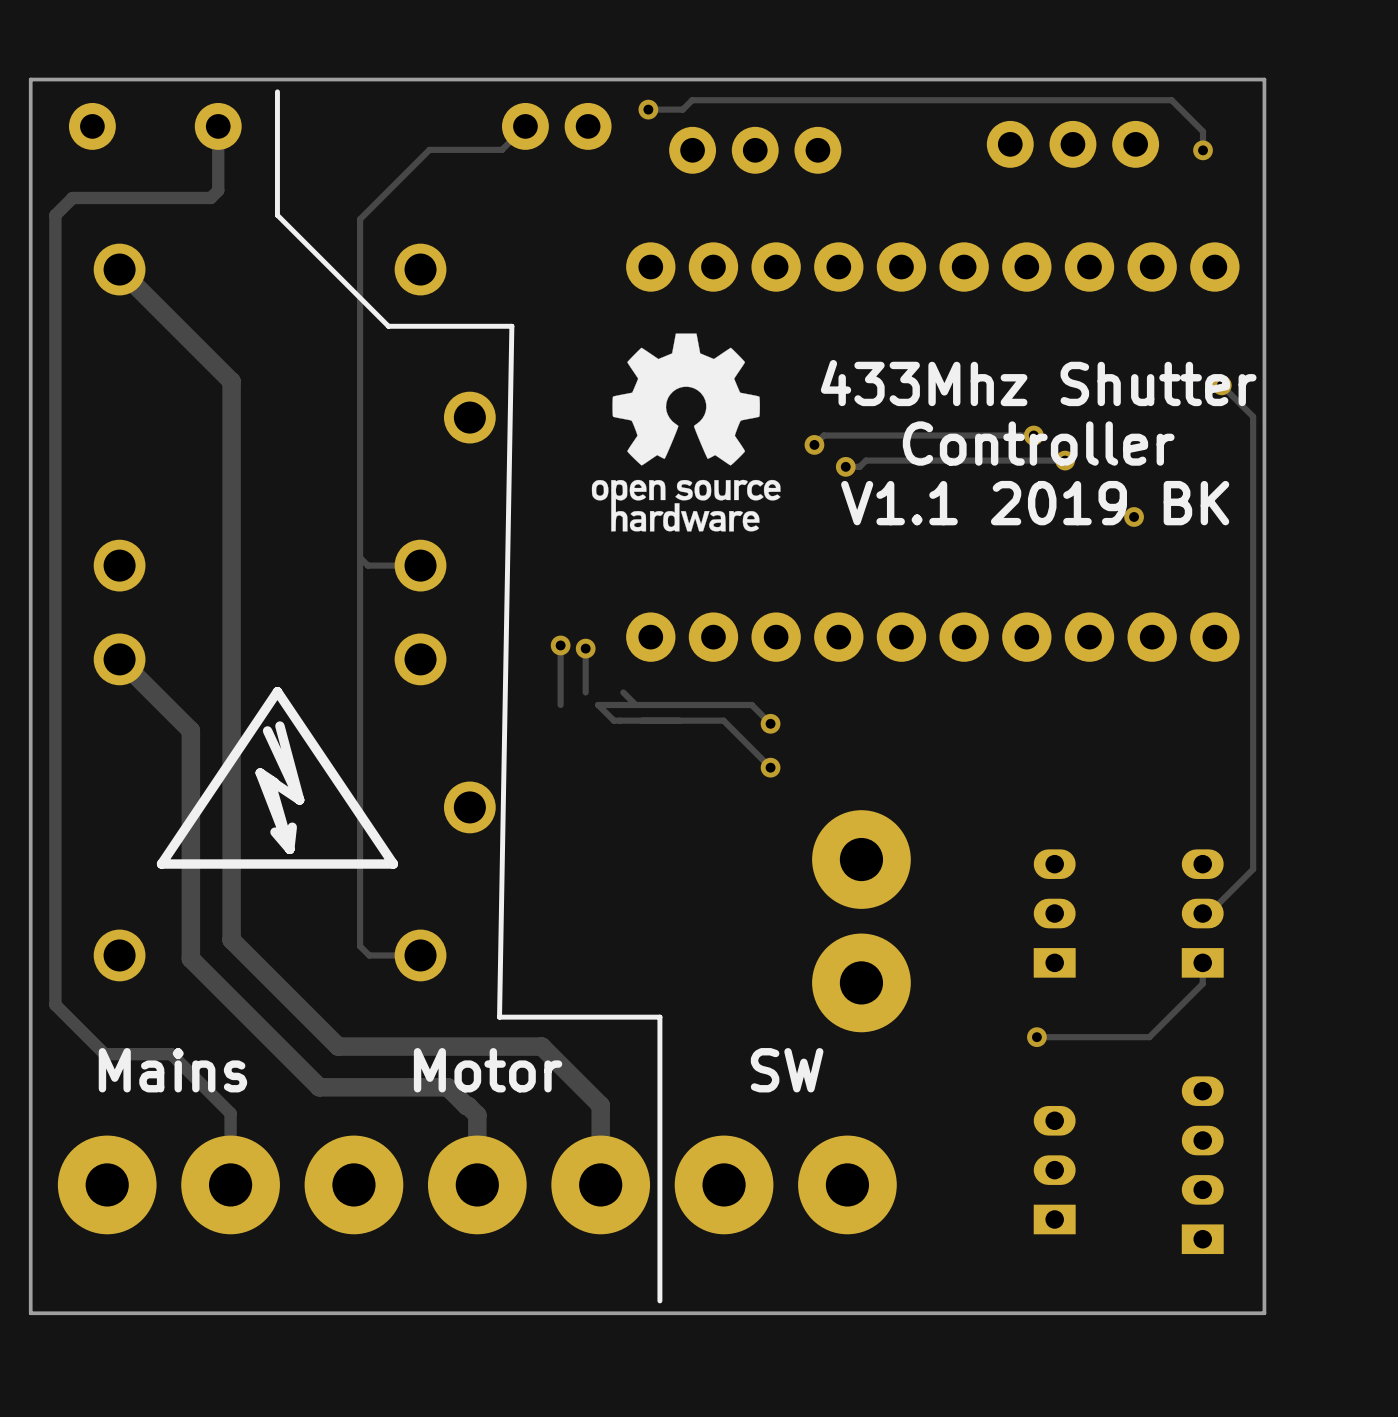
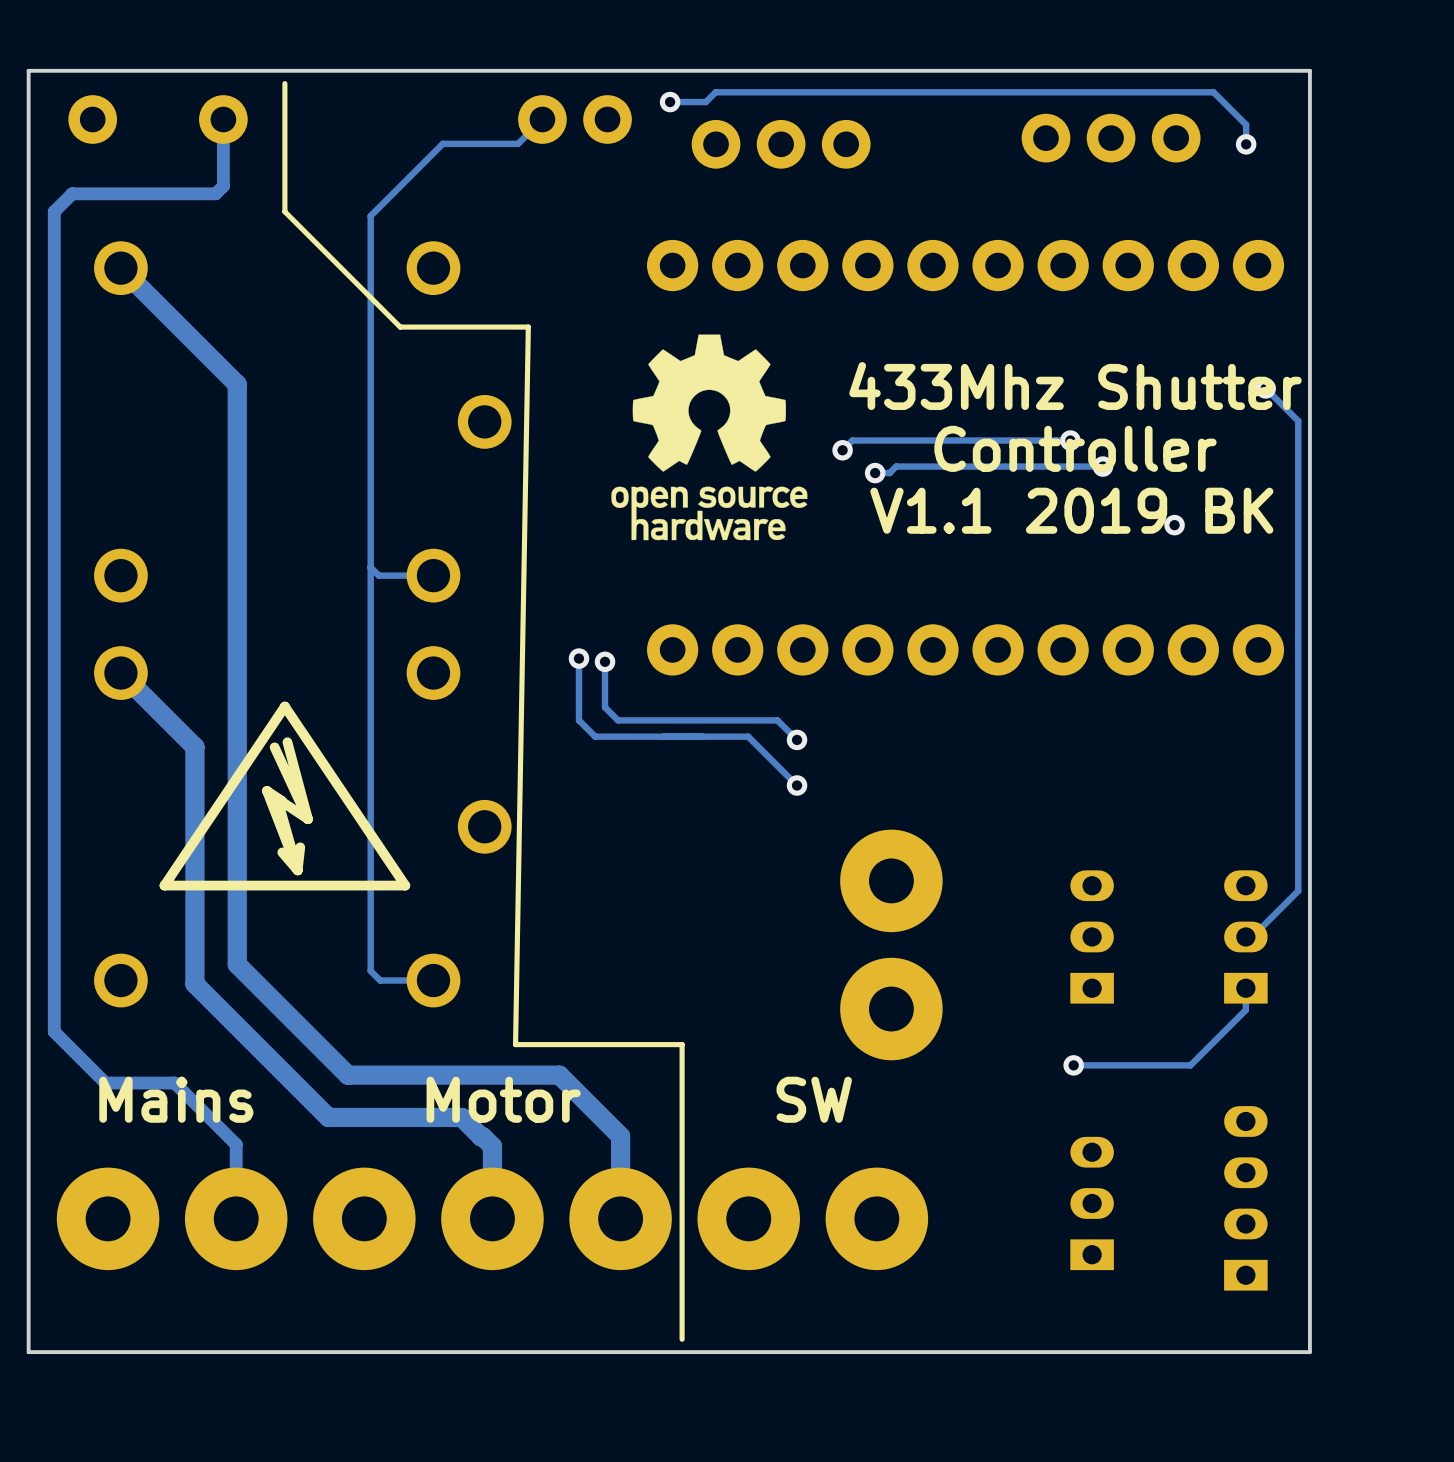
track: (623, 692) (635, 705) -> (605, 707) (618, 720)
track: (598, 705) (613, 720) -> (578, 720) (595, 736) (634, 736)

